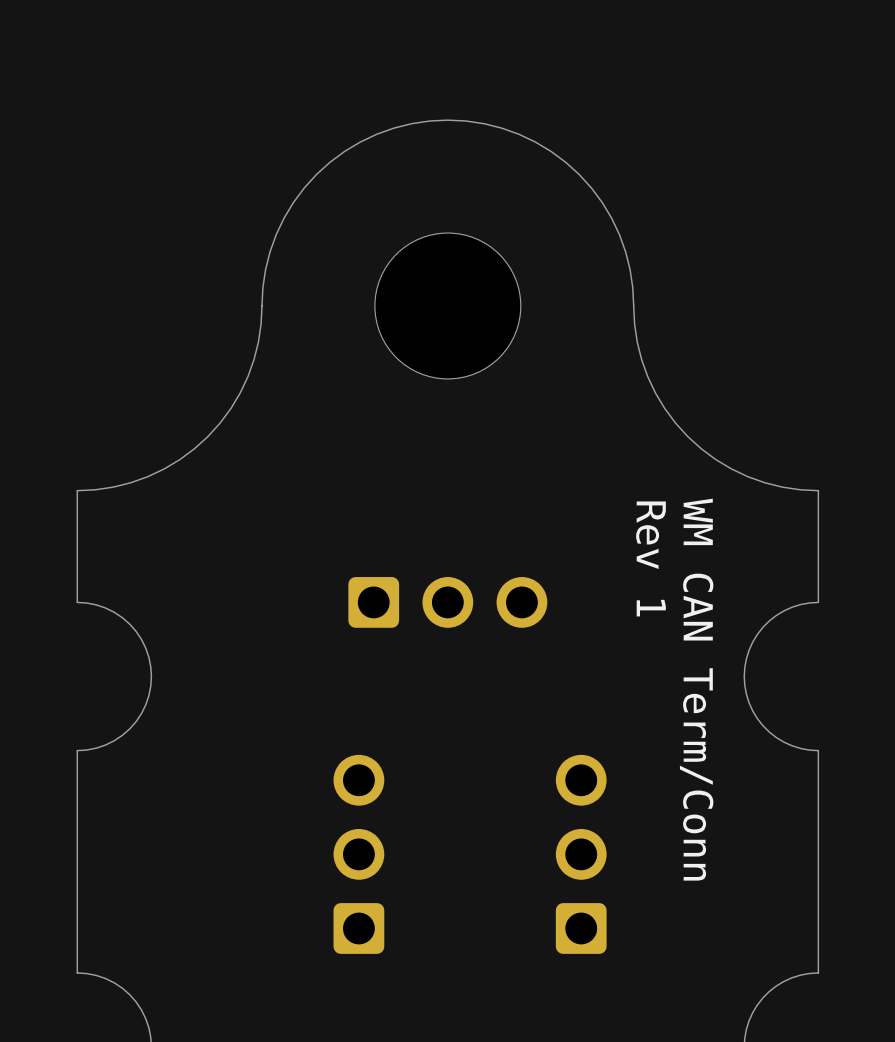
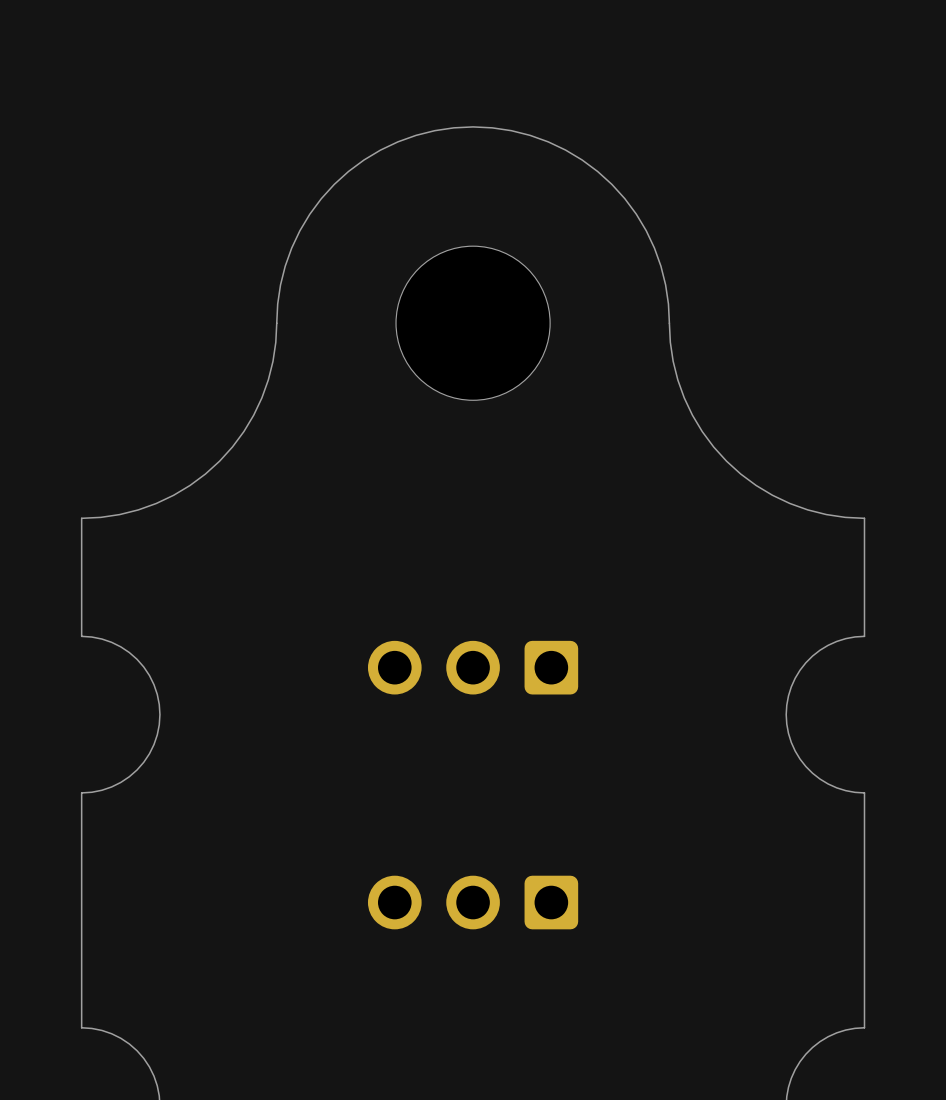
text: Rev 1 (650, 558) -> none
part rotation: 0° (447, 602) -> 180° (473, 667)
text: WM CAN Term/Conn (696, 689) -> none
part: (358, 854) -> none
part: none -> (473, 902)
part: (581, 854) -> none

